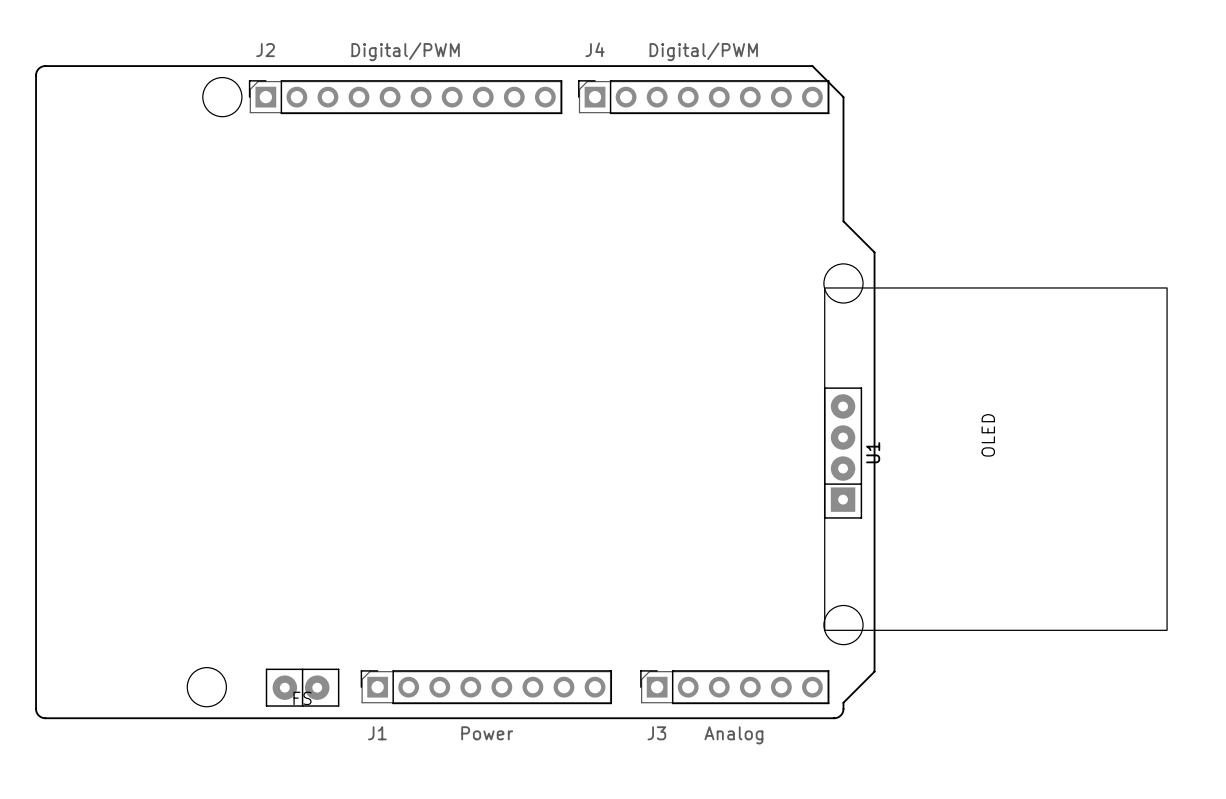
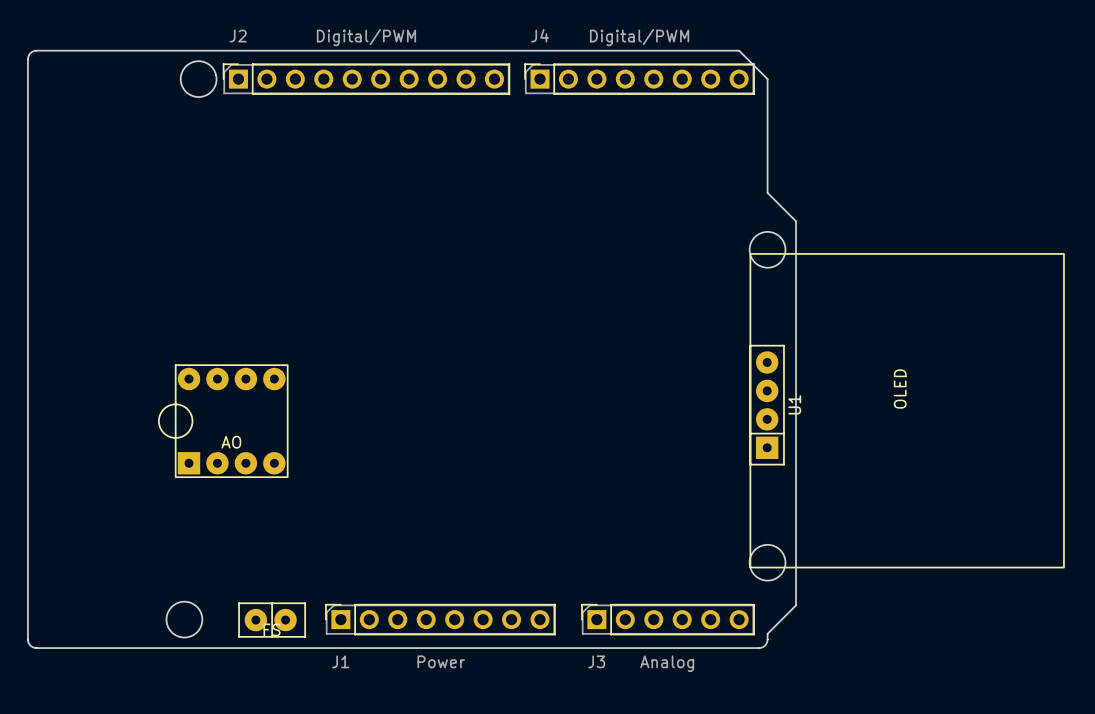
part: none -> (223, 421)

